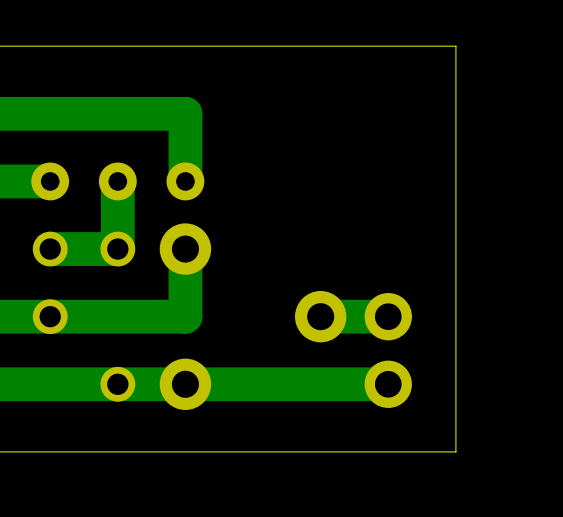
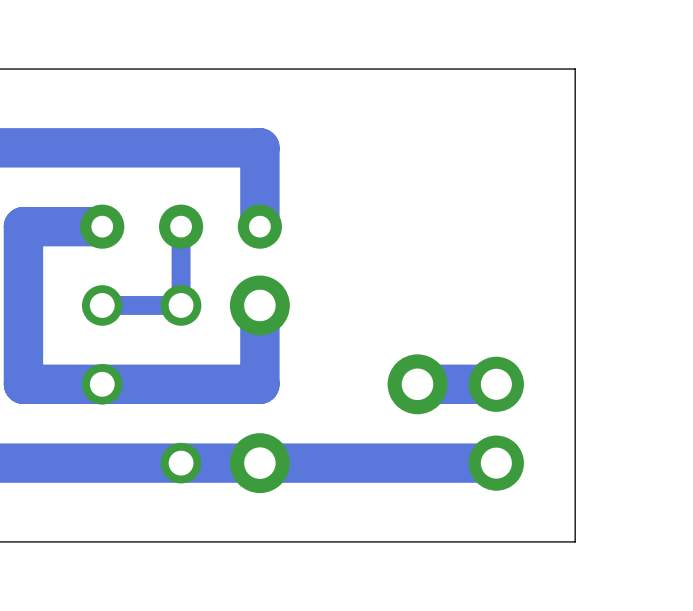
track width: thick (117, 181) (117, 249) (50, 249) -> thin (181, 226) (181, 305) (102, 305)

